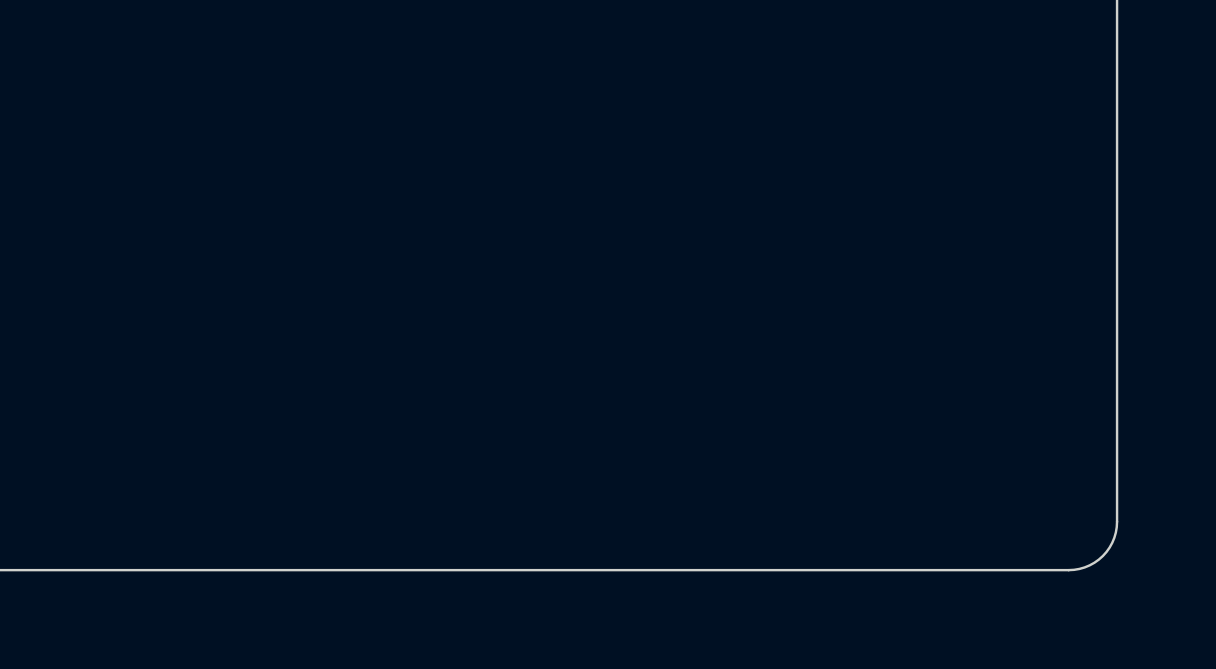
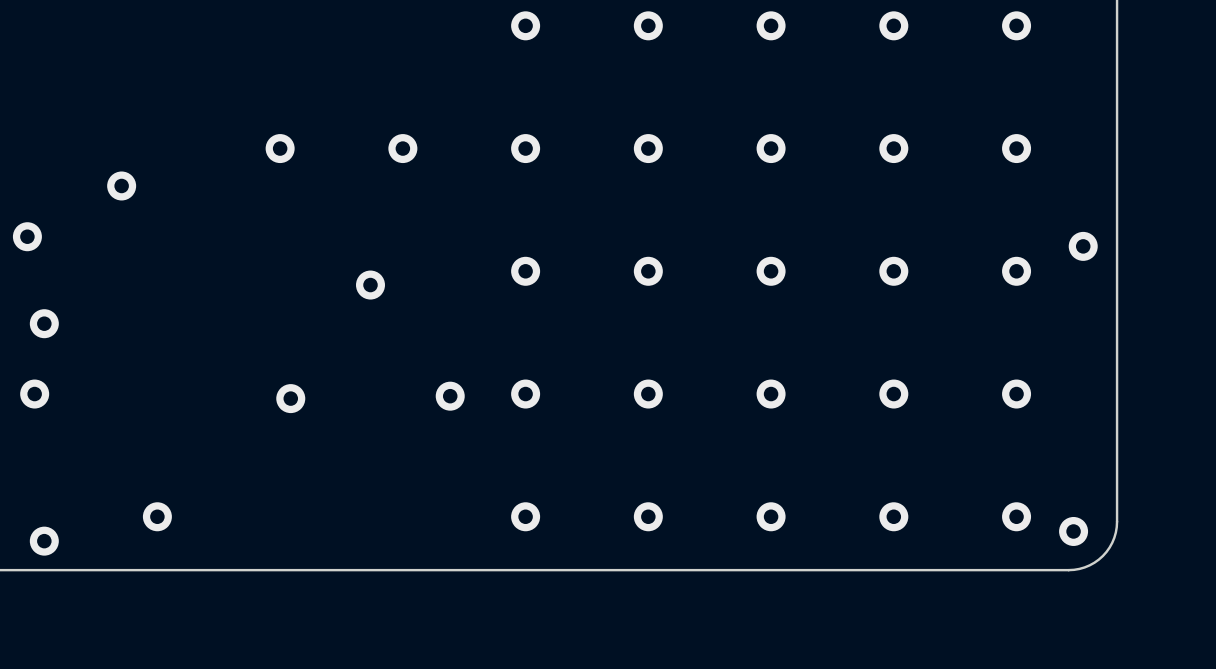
via: none -> (525, 25)
via: none -> (648, 25)
via: none -> (771, 25)
via: none -> (893, 25)
via: none -> (1016, 25)
via: none -> (280, 148)
via: none -> (402, 148)
via: none -> (525, 148)
via: none -> (648, 148)
via: none -> (771, 148)
via: none -> (893, 148)
via: none -> (1016, 148)
via: none -> (121, 185)
via: none -> (27, 236)
via: none -> (1083, 246)
via: none -> (525, 271)
via: none -> (648, 271)
via: none -> (771, 271)
via: none -> (893, 271)
via: none -> (1016, 271)
via: none -> (370, 285)
via: none -> (44, 323)
via: none -> (34, 394)
via: none -> (525, 394)
via: none -> (648, 394)
via: none -> (771, 394)
via: none -> (893, 394)
via: none -> (1016, 394)
via: none -> (450, 396)
via: none -> (290, 398)
via: none -> (157, 516)
via: none -> (525, 516)
via: none -> (648, 516)
via: none -> (771, 516)
via: none -> (893, 516)
via: none -> (1016, 516)
via: none -> (1073, 531)
via: none -> (44, 541)

